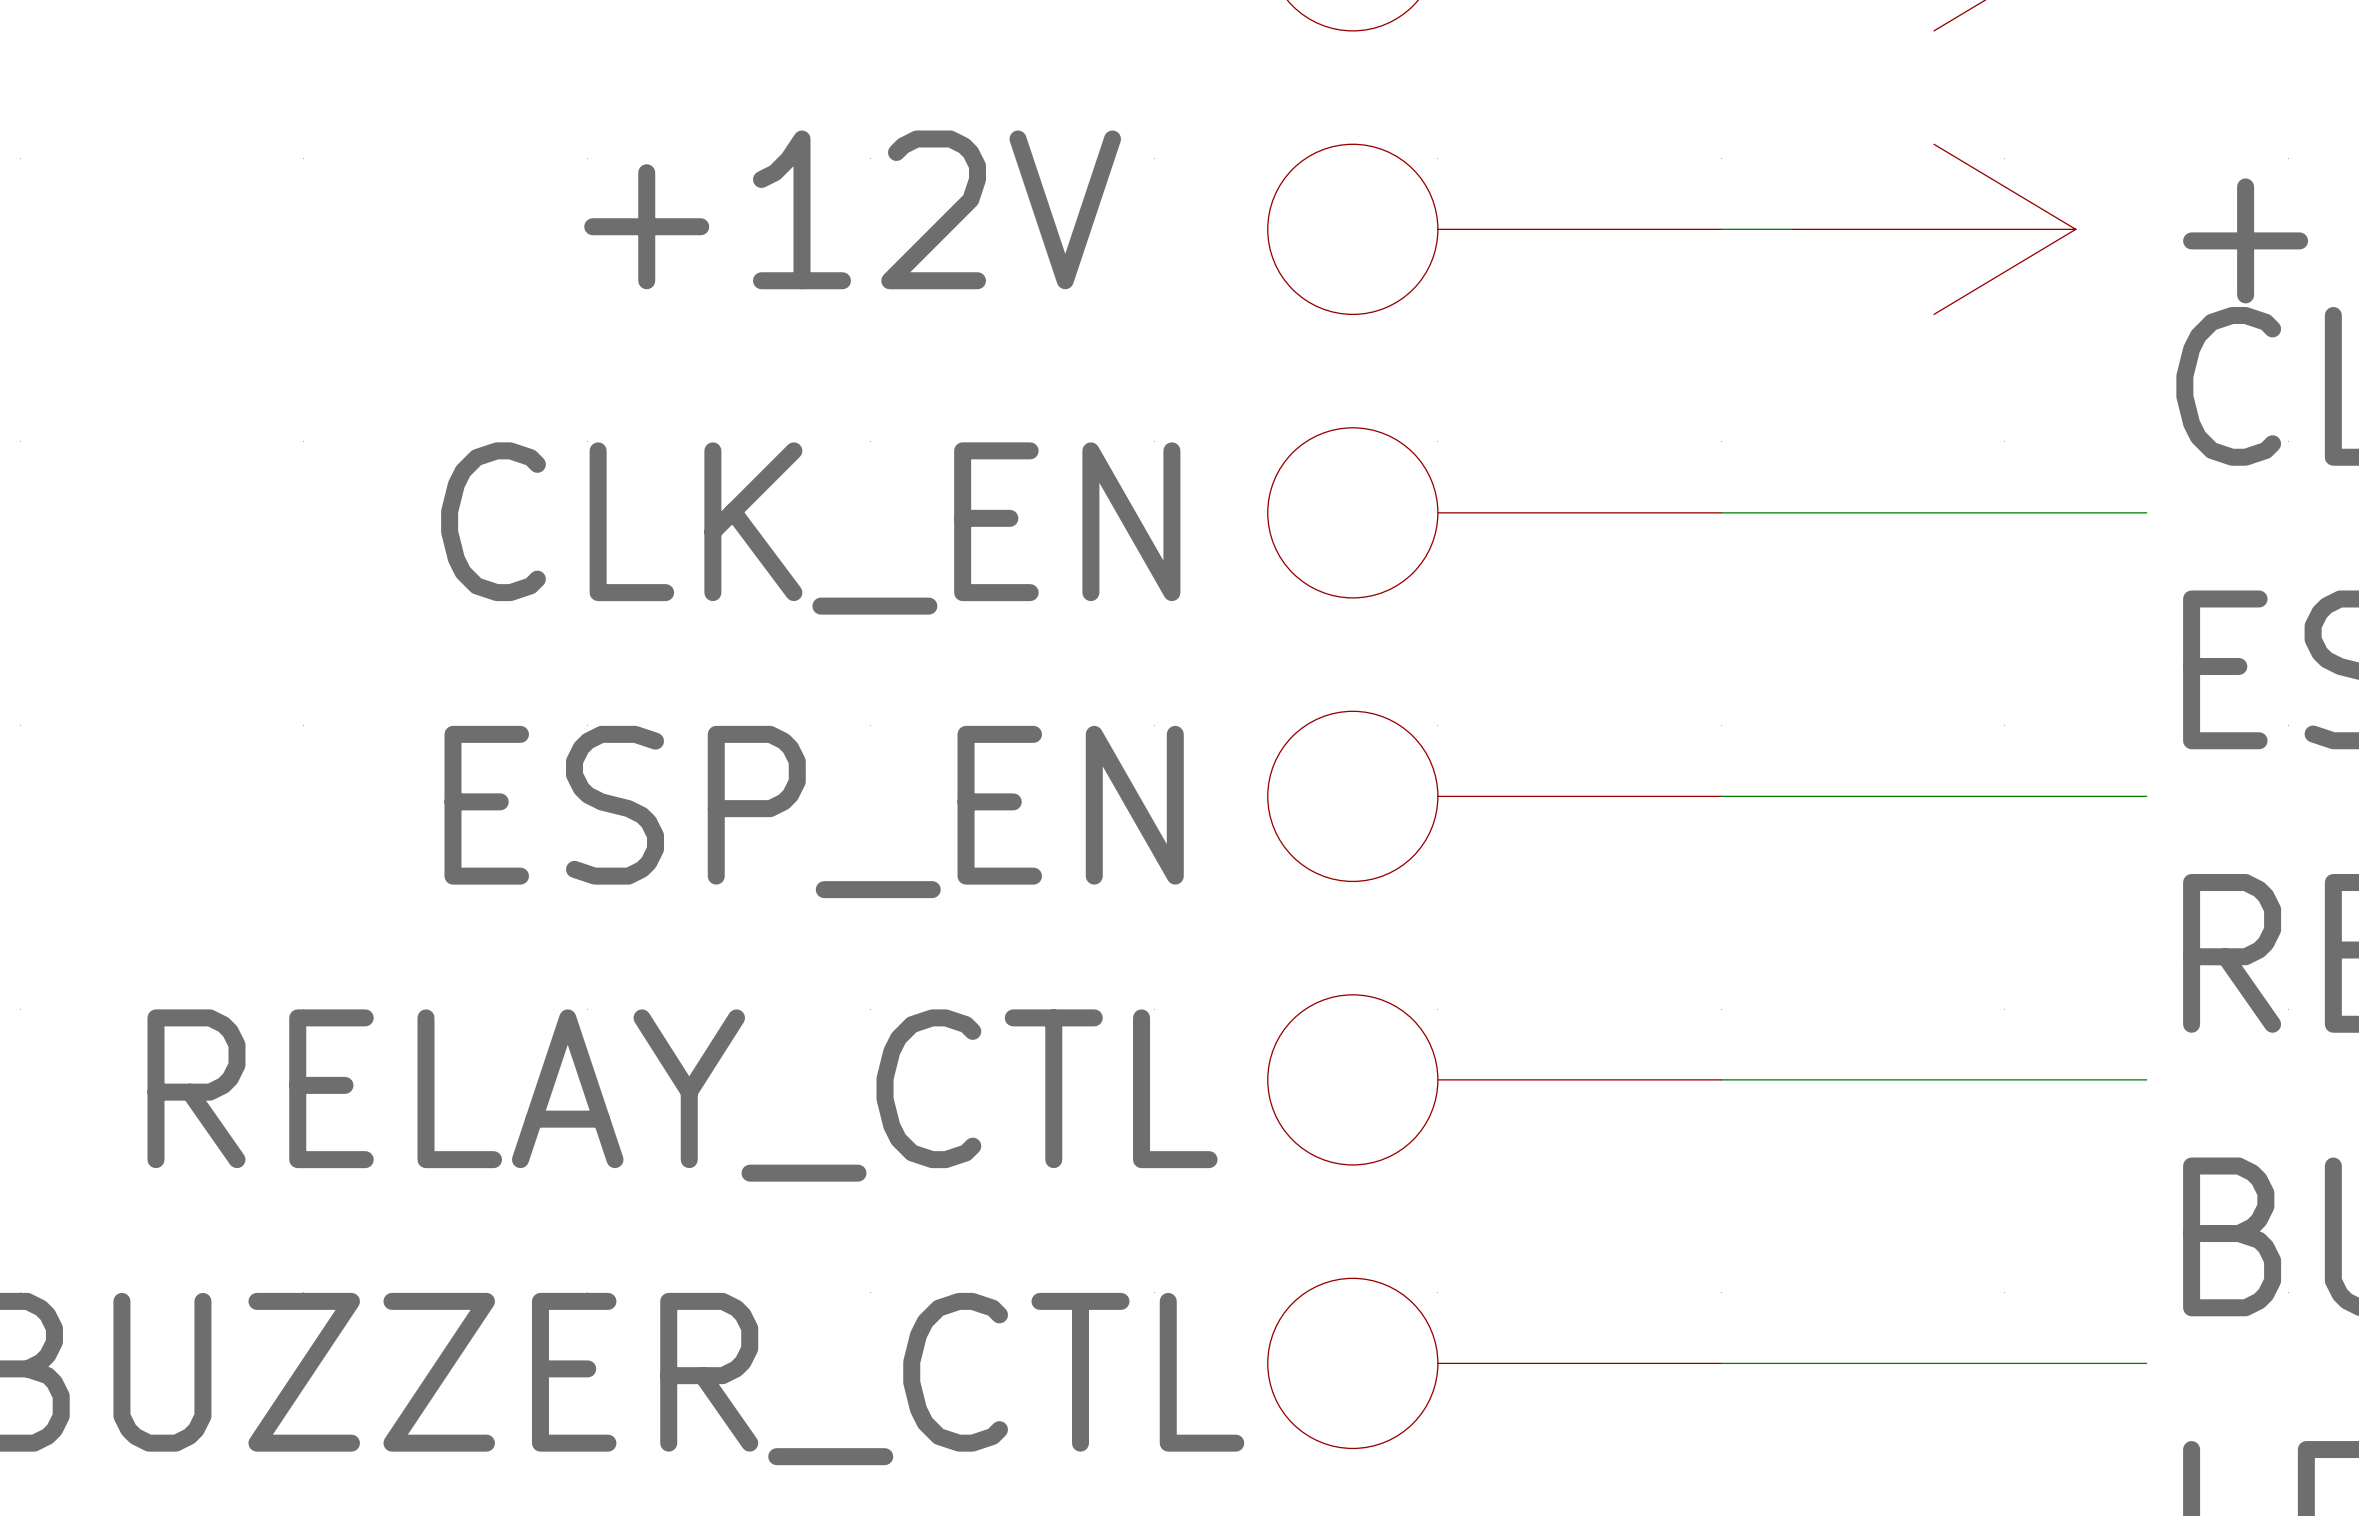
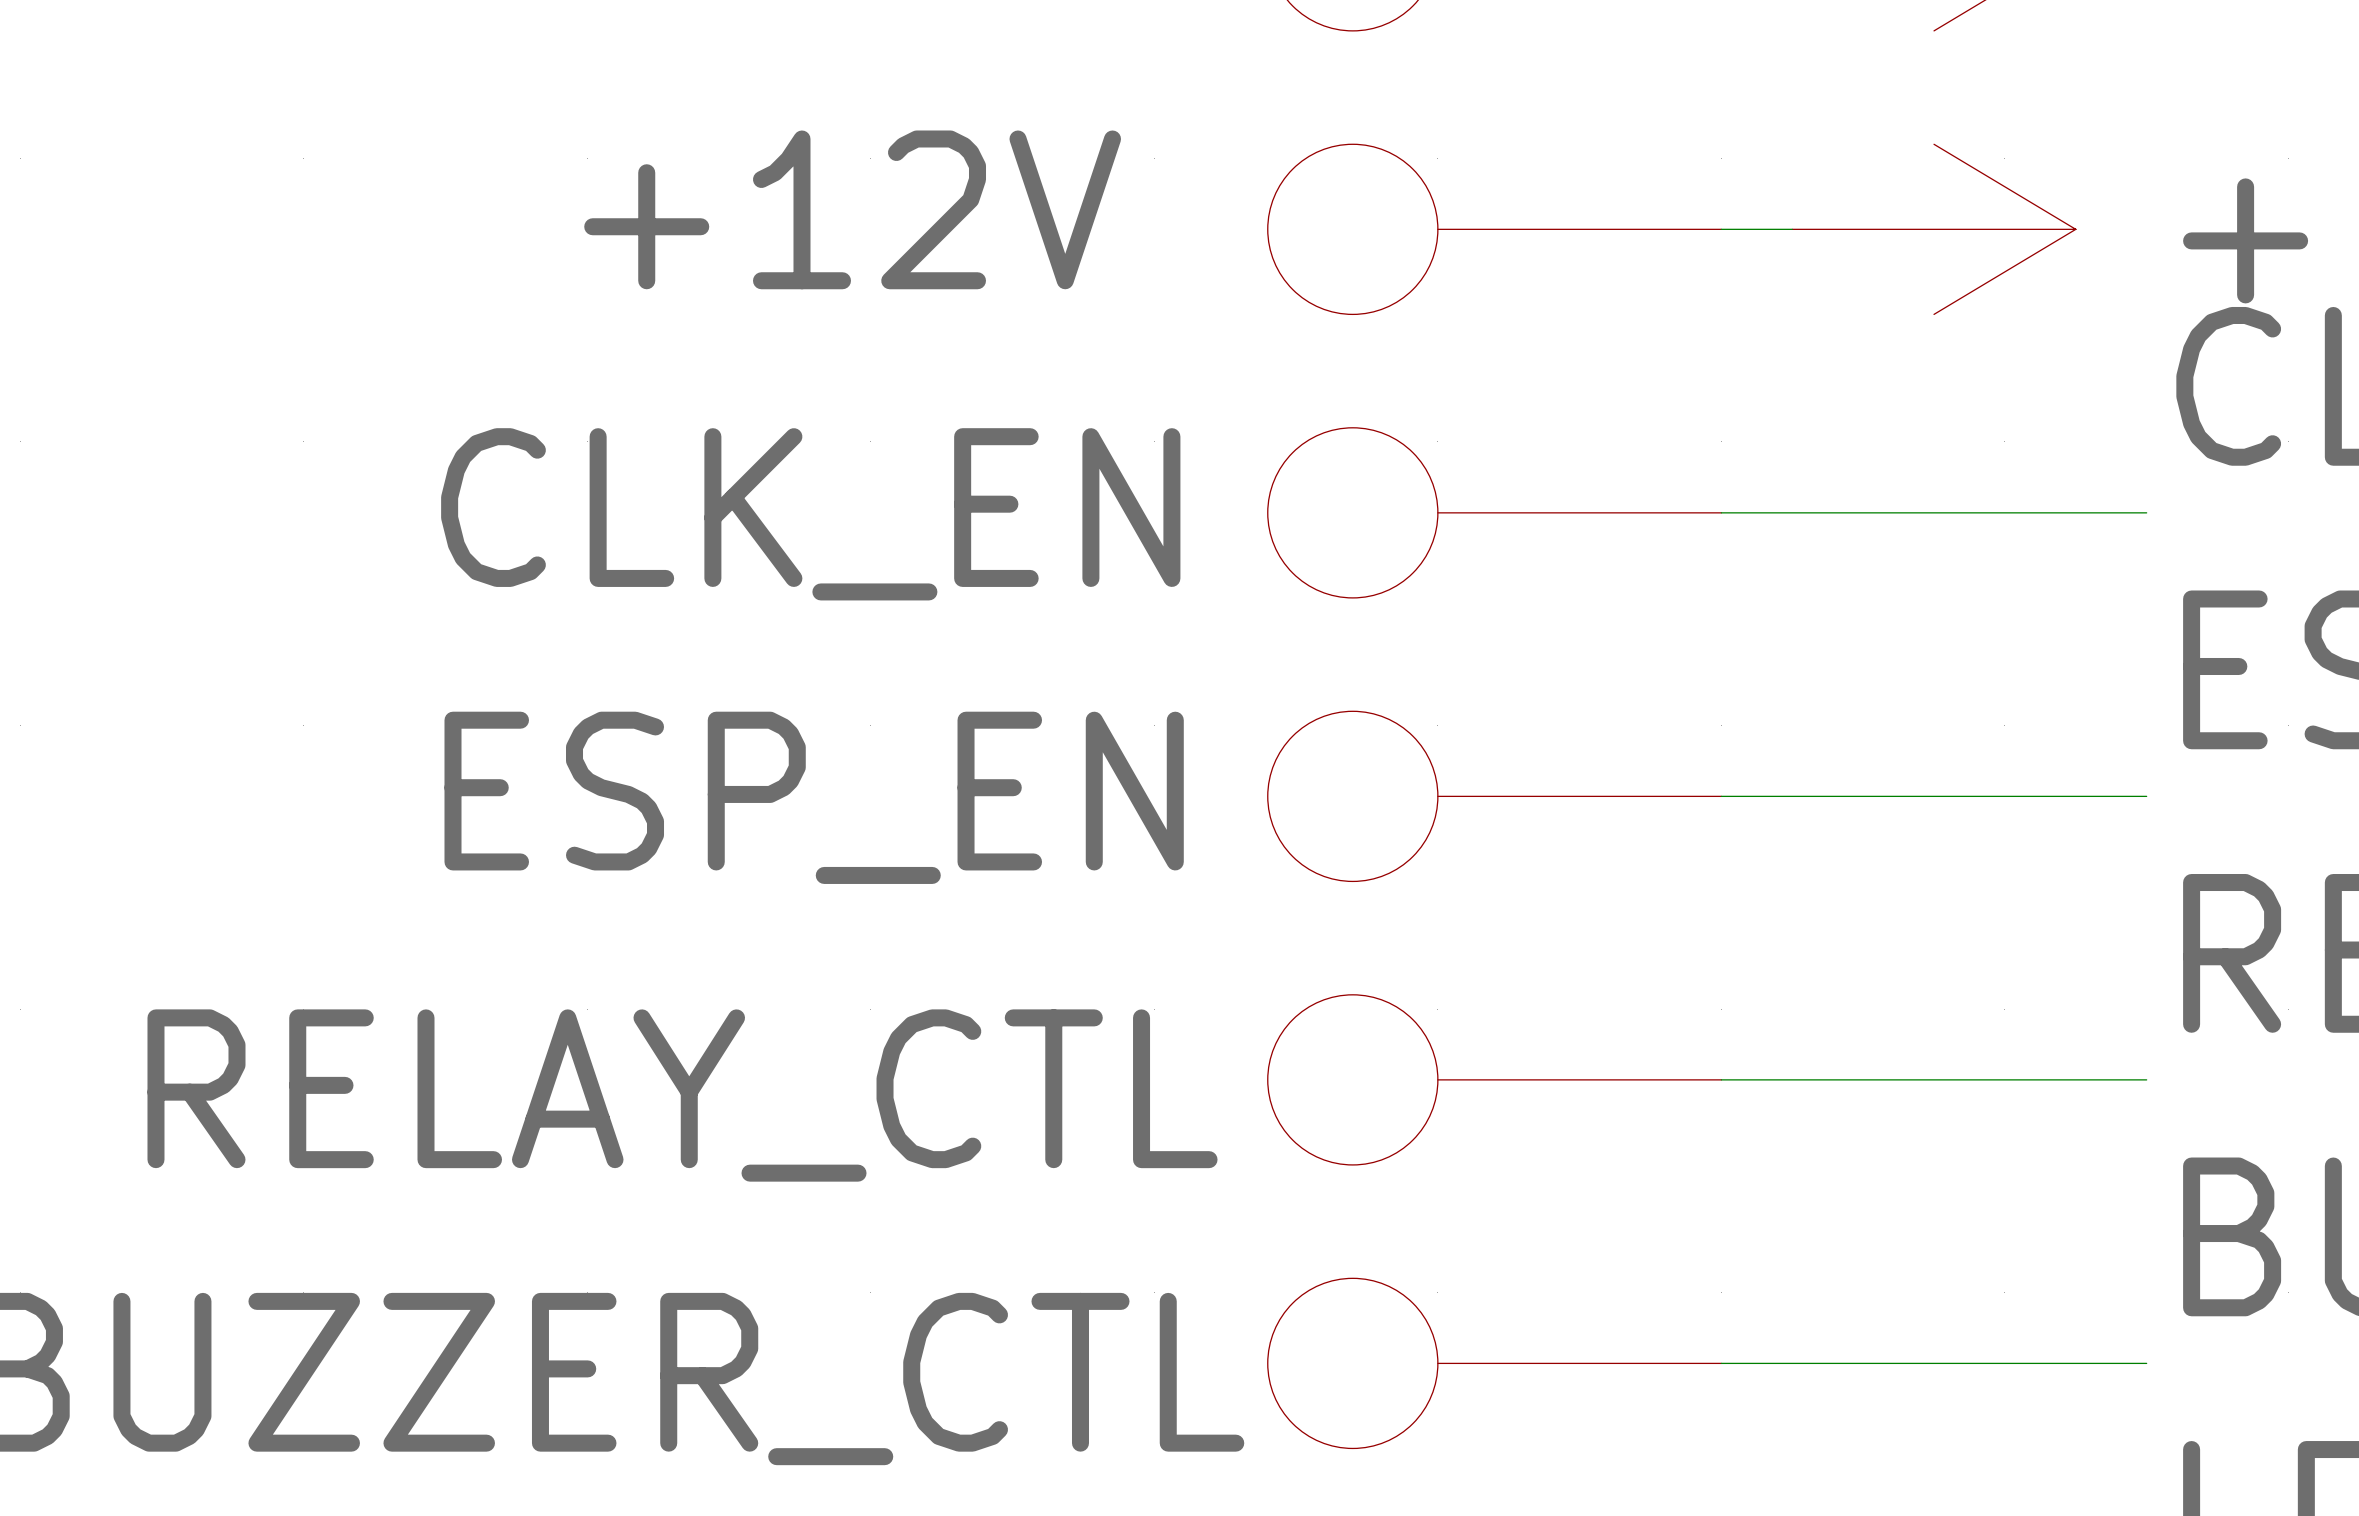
part value position: CLK_EN (810, 528) -> CLK_EN (810, 514)
part value position: ESP_EN (814, 812) -> ESP_EN (814, 797)

